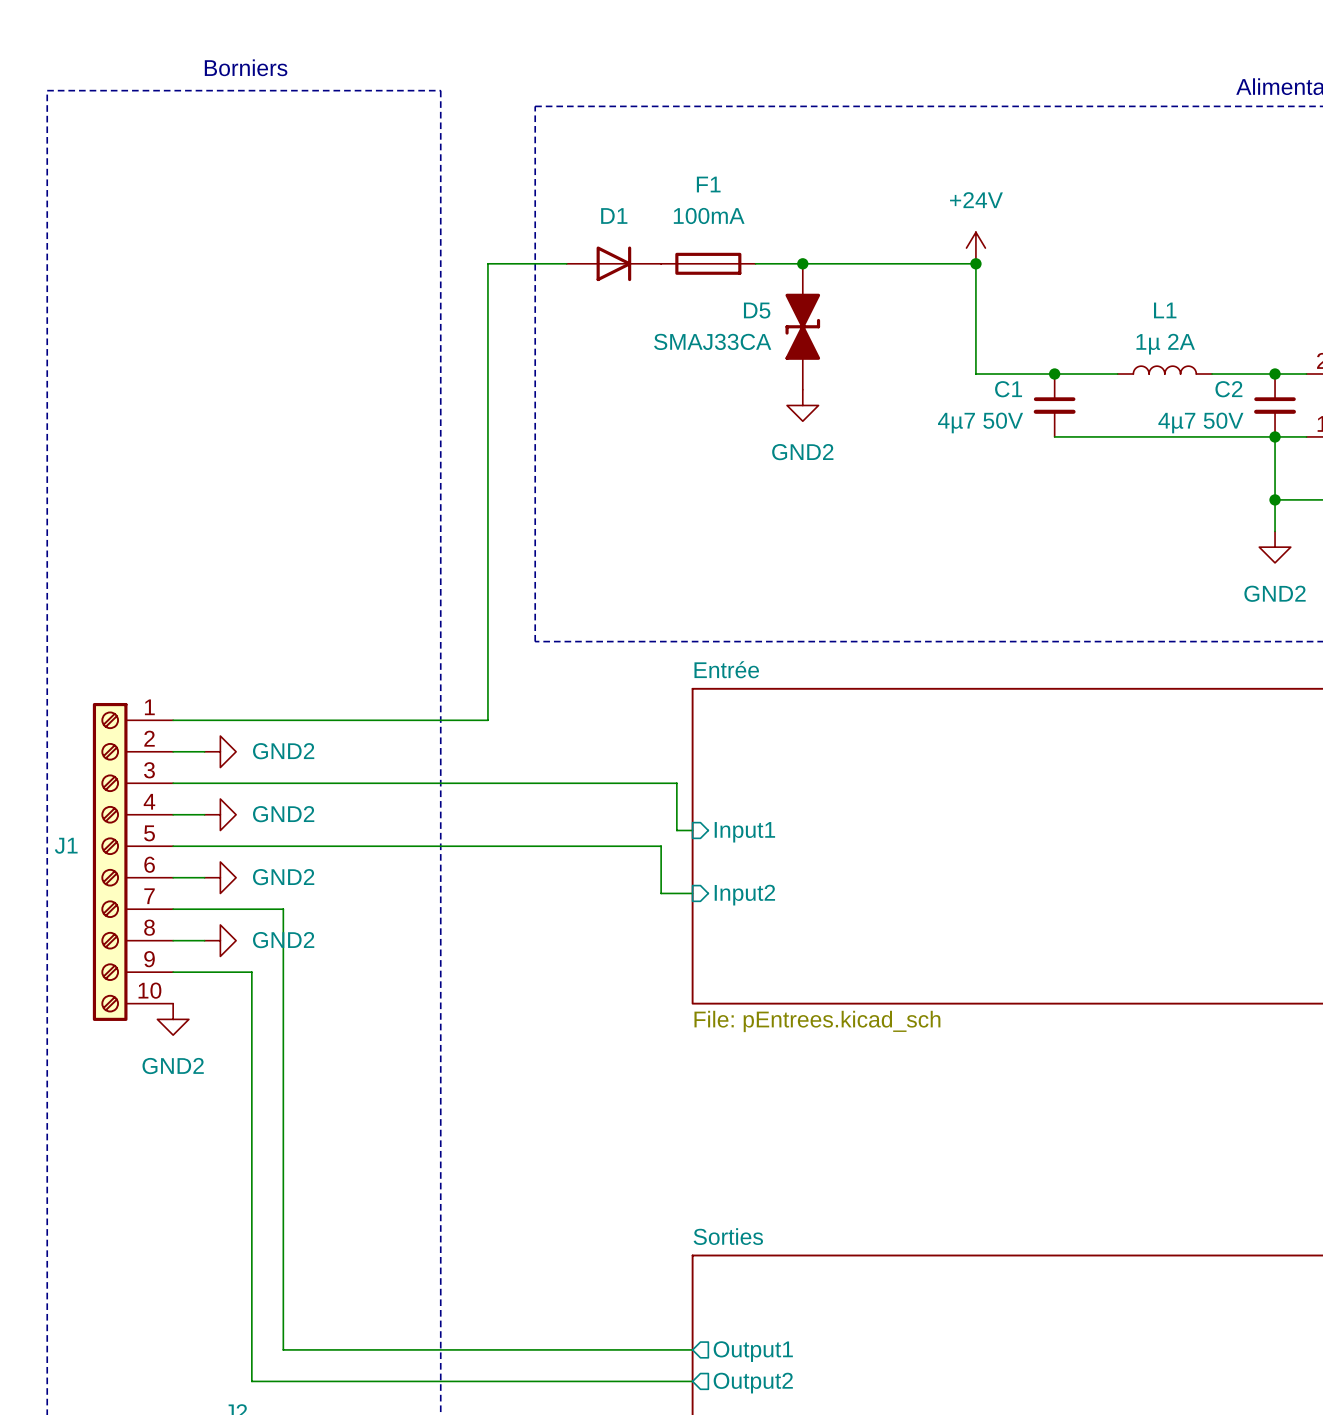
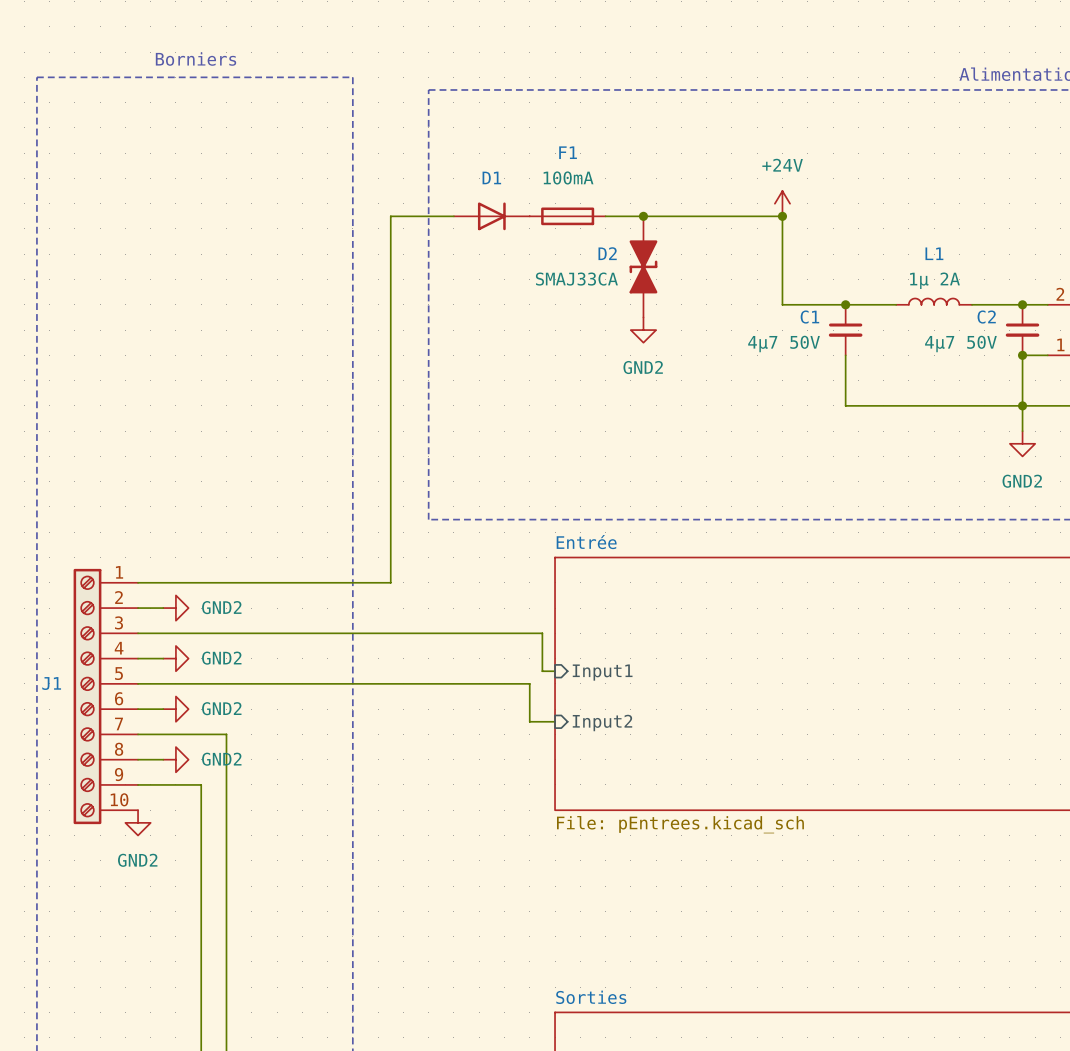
D5 name: D5 (757, 310) -> D2 (607, 253)
wire: (1054, 436) (1275, 436) -> (845, 355) (845, 405) (1022, 405)

